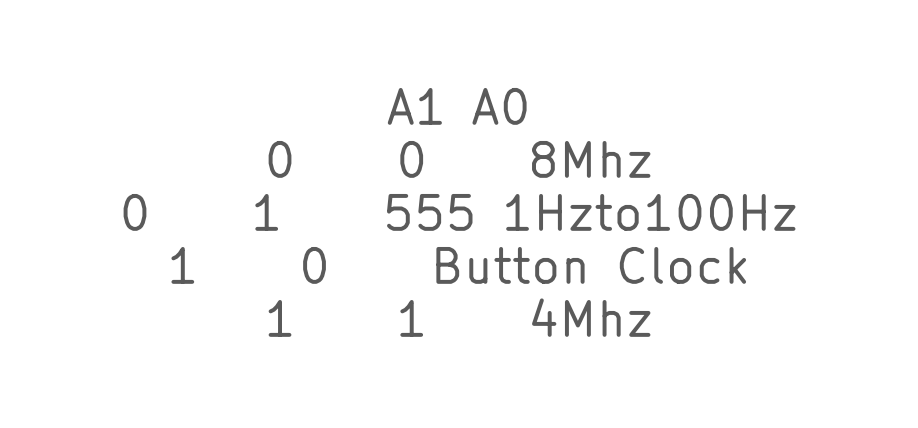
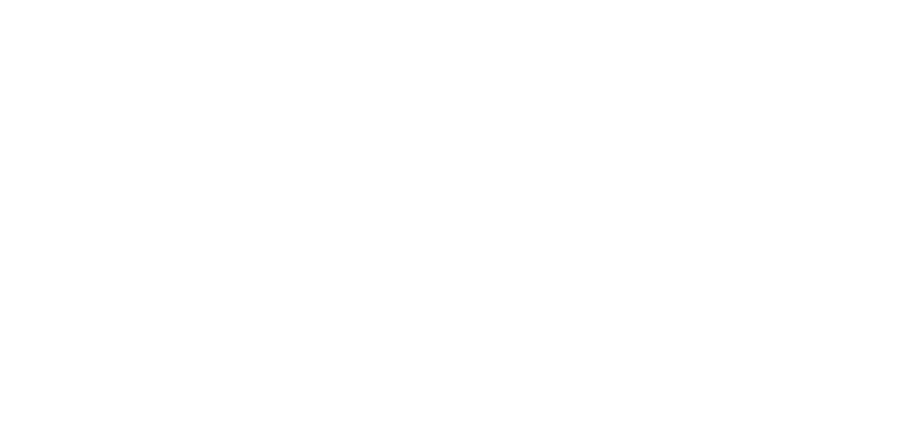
text: A1 A0 (457, 106) -> none
text: 0 0 8Mhz (459, 159) -> none
text: 0 1 555 1Hzto100Hz (459, 212) -> none
text: 1 0 Button Clock (458, 265) -> none
text: 1 1 4Mhz (459, 317) -> none

